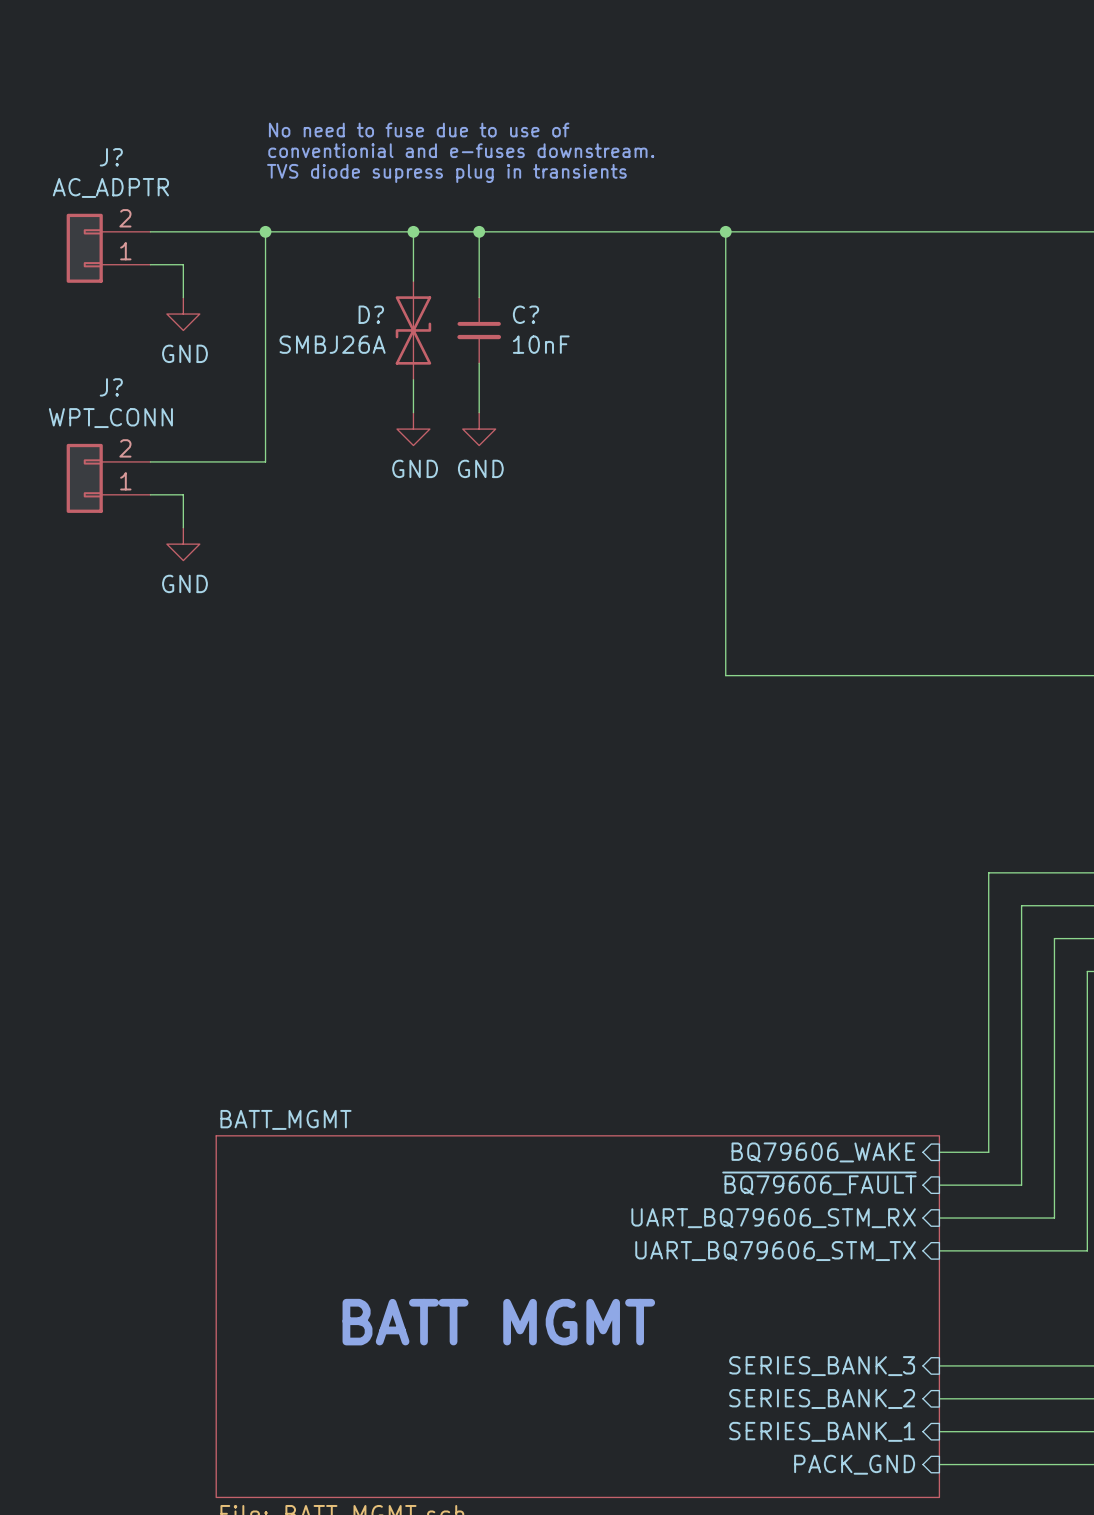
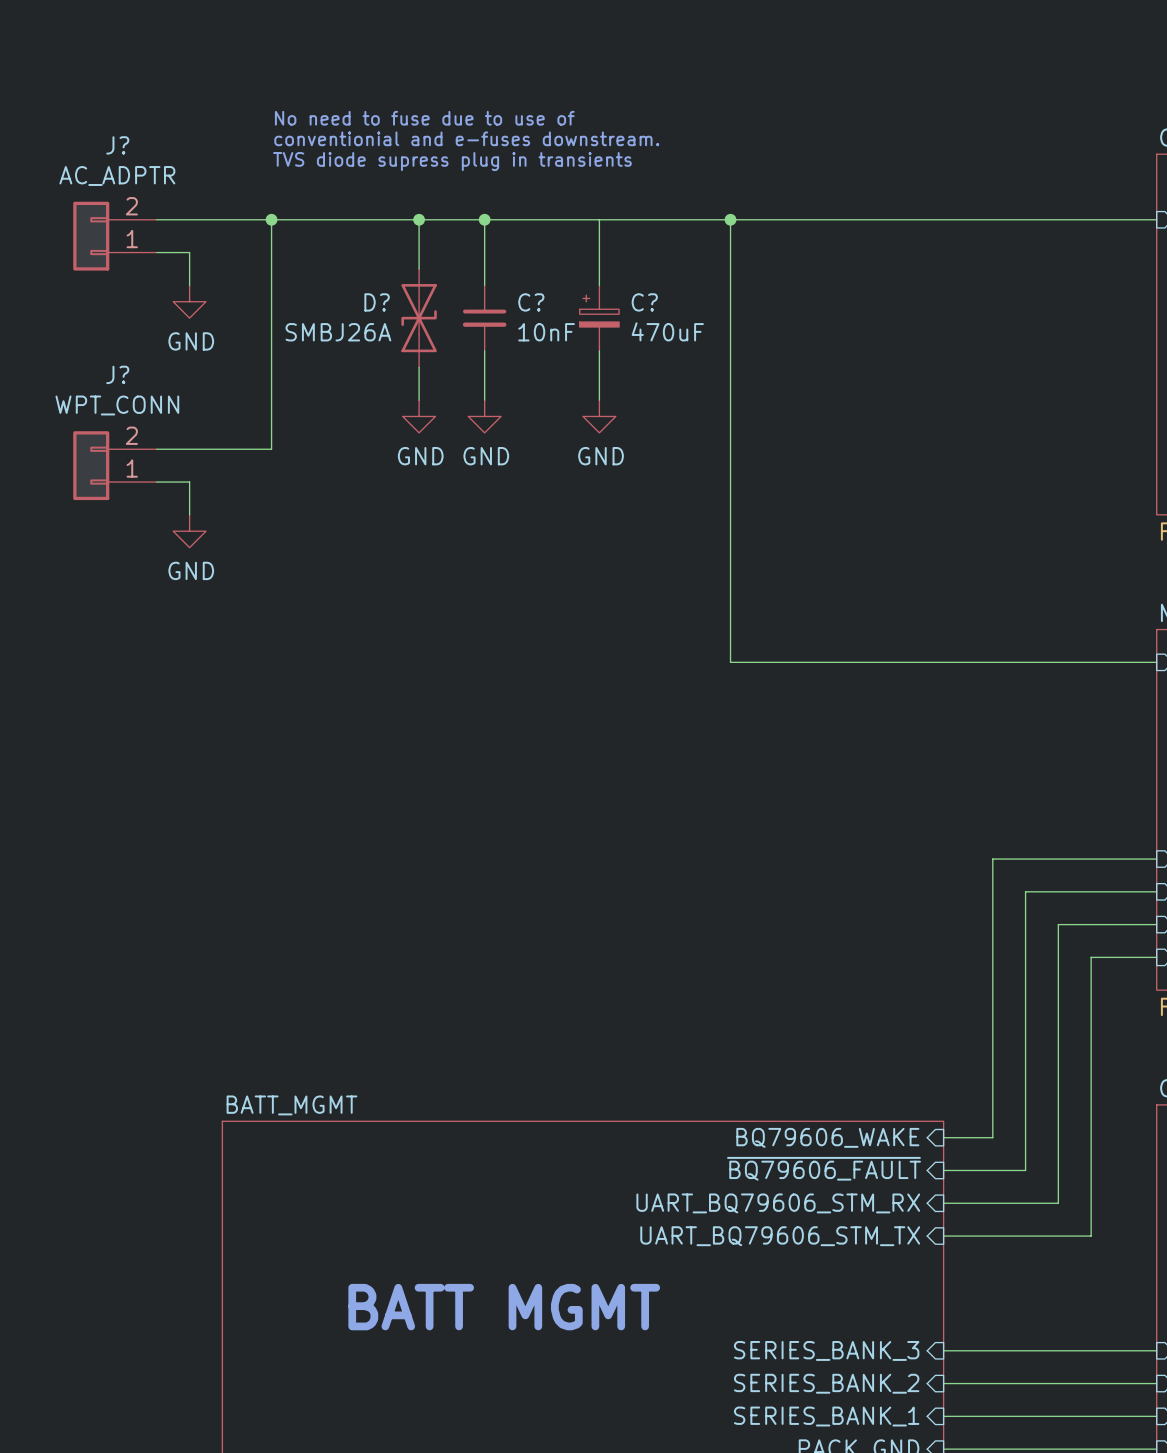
wire: none -> (599, 219) (599, 285)
C?: none -> 470uF (599, 318)
wire: none -> (599, 350) (599, 400)
power symbol: none -> GND (599, 416)

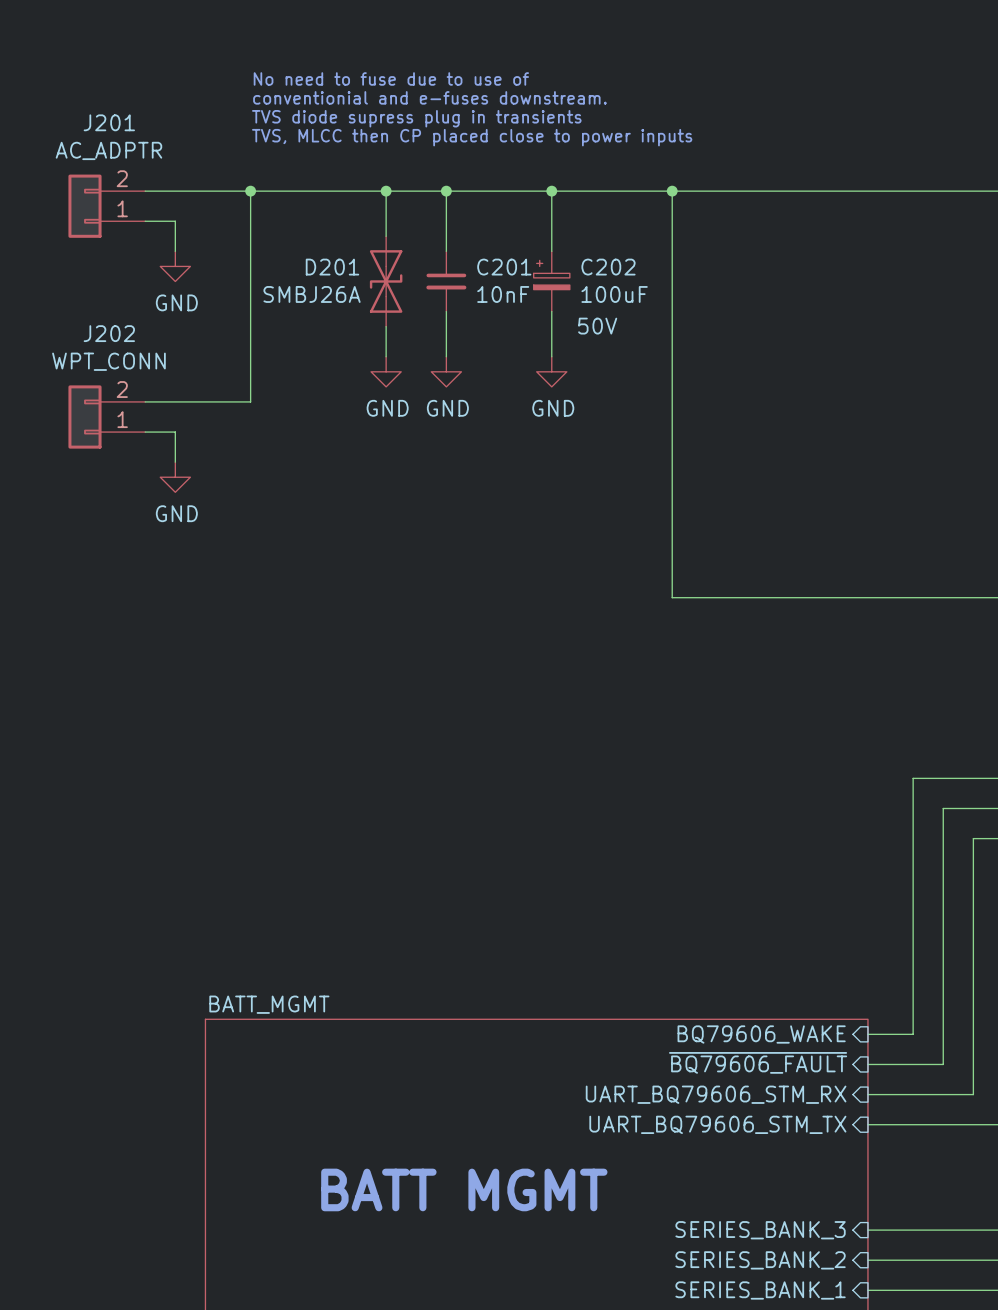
text: none -> No need to fuse due to use of (391, 78)
text: No need to fuse due to use of (424, 118) -> conventionial and e-fuses downstream. (429, 97)
text: conventionial and e-fuses downstream. (466, 138) -> TVS diode supress plug in transients (416, 118)
J? name: J? (117, 145) -> J201 (109, 122)
text: TVS diode supress plug in transients (452, 161) -> TVS, MLCC then CP placed close to power inputs (472, 137)
junction: none -> (551, 191)
D? name: D? (377, 302) -> D201 (332, 267)
C? name: C? (531, 302) -> C201 (504, 267)
C? name: C? (644, 302) -> C202 (608, 267)
C? value: 470uF (667, 331) -> 100uF (614, 294)
C? text: none -> 50V (597, 326)
J? name: J? (117, 374) -> J202 (109, 333)

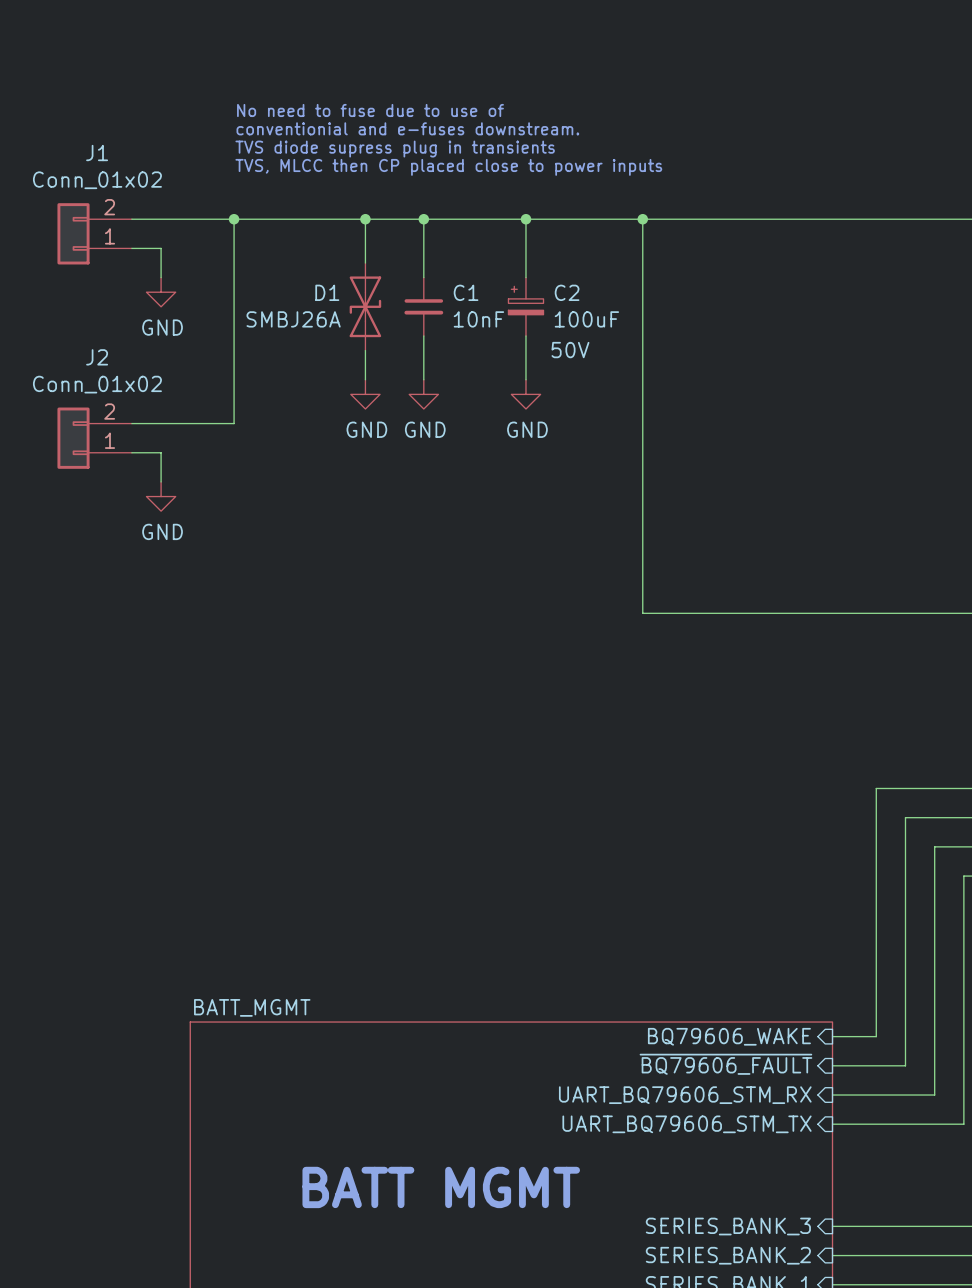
J201 name: J201 (109, 122) -> J1 (97, 153)
J201 value: AC_ADPTR (108, 150) -> Conn_01x02 (97, 180)
D201 name: D201 (332, 267) -> D1 (327, 292)
C201 name: C201 (504, 267) -> C1 (466, 292)
C202 name: C202 (608, 267) -> C2 (567, 292)
J202 name: J202 (109, 333) -> J2 (97, 357)
J202 value: WPT_CONN (108, 361) -> Conn_01x02 (97, 384)

